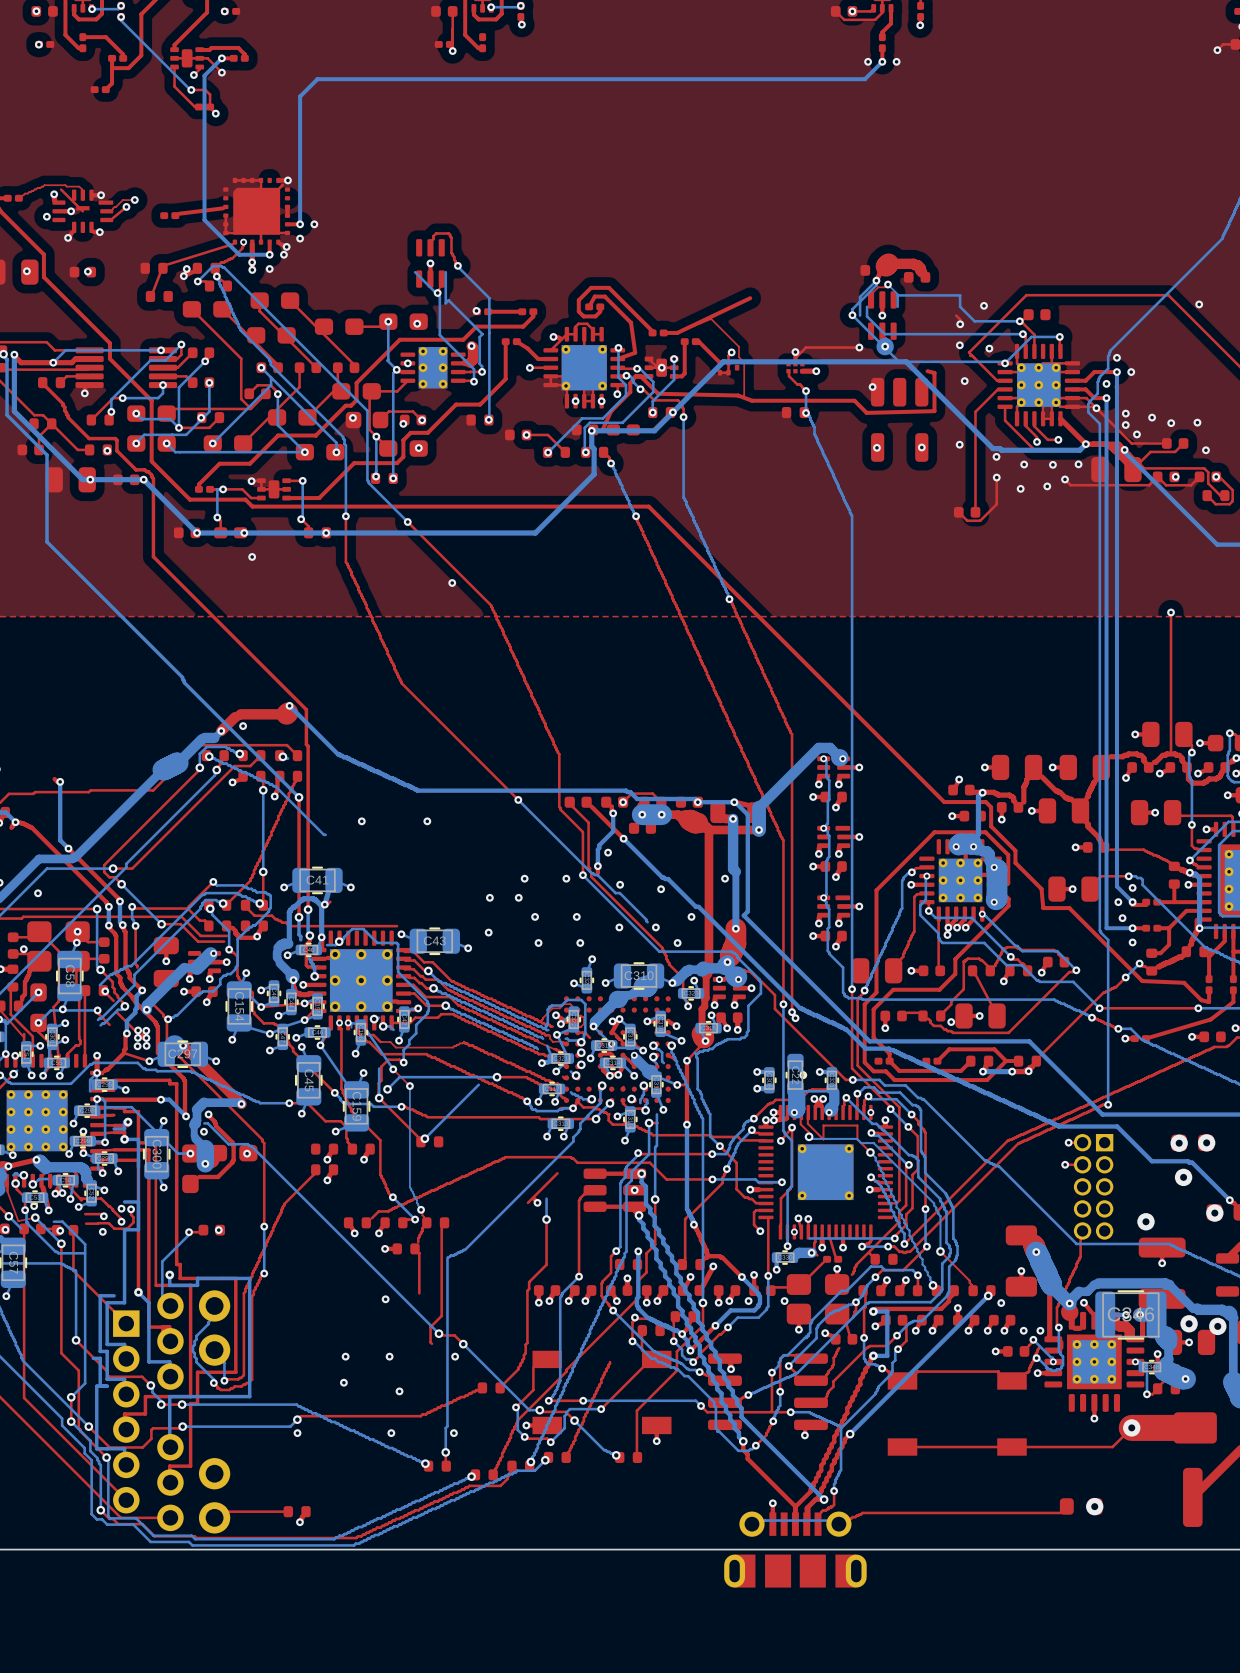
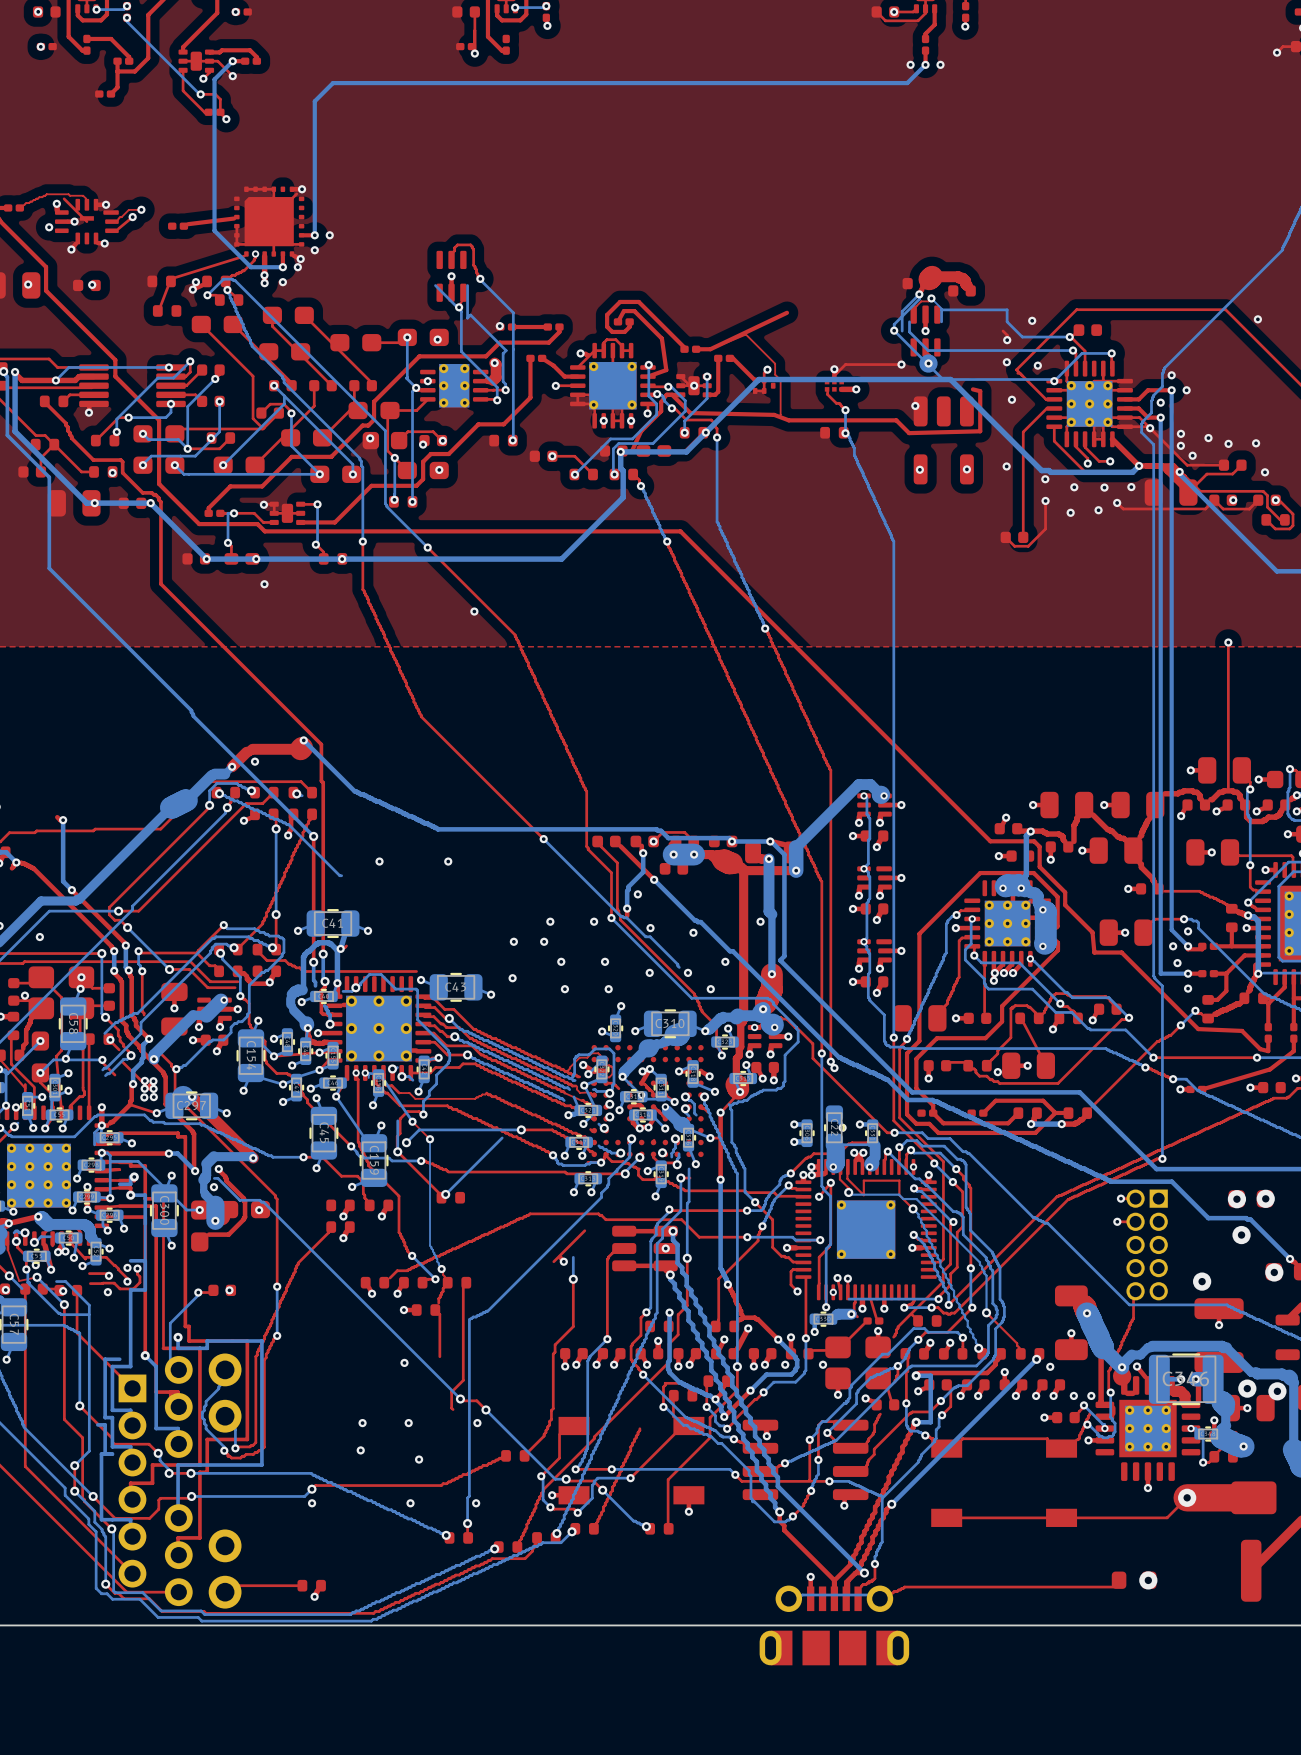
top track: (287, 206) (287, 215) -> none
via: (1028, 1071) -> none
via: (634, 1317) -> none

